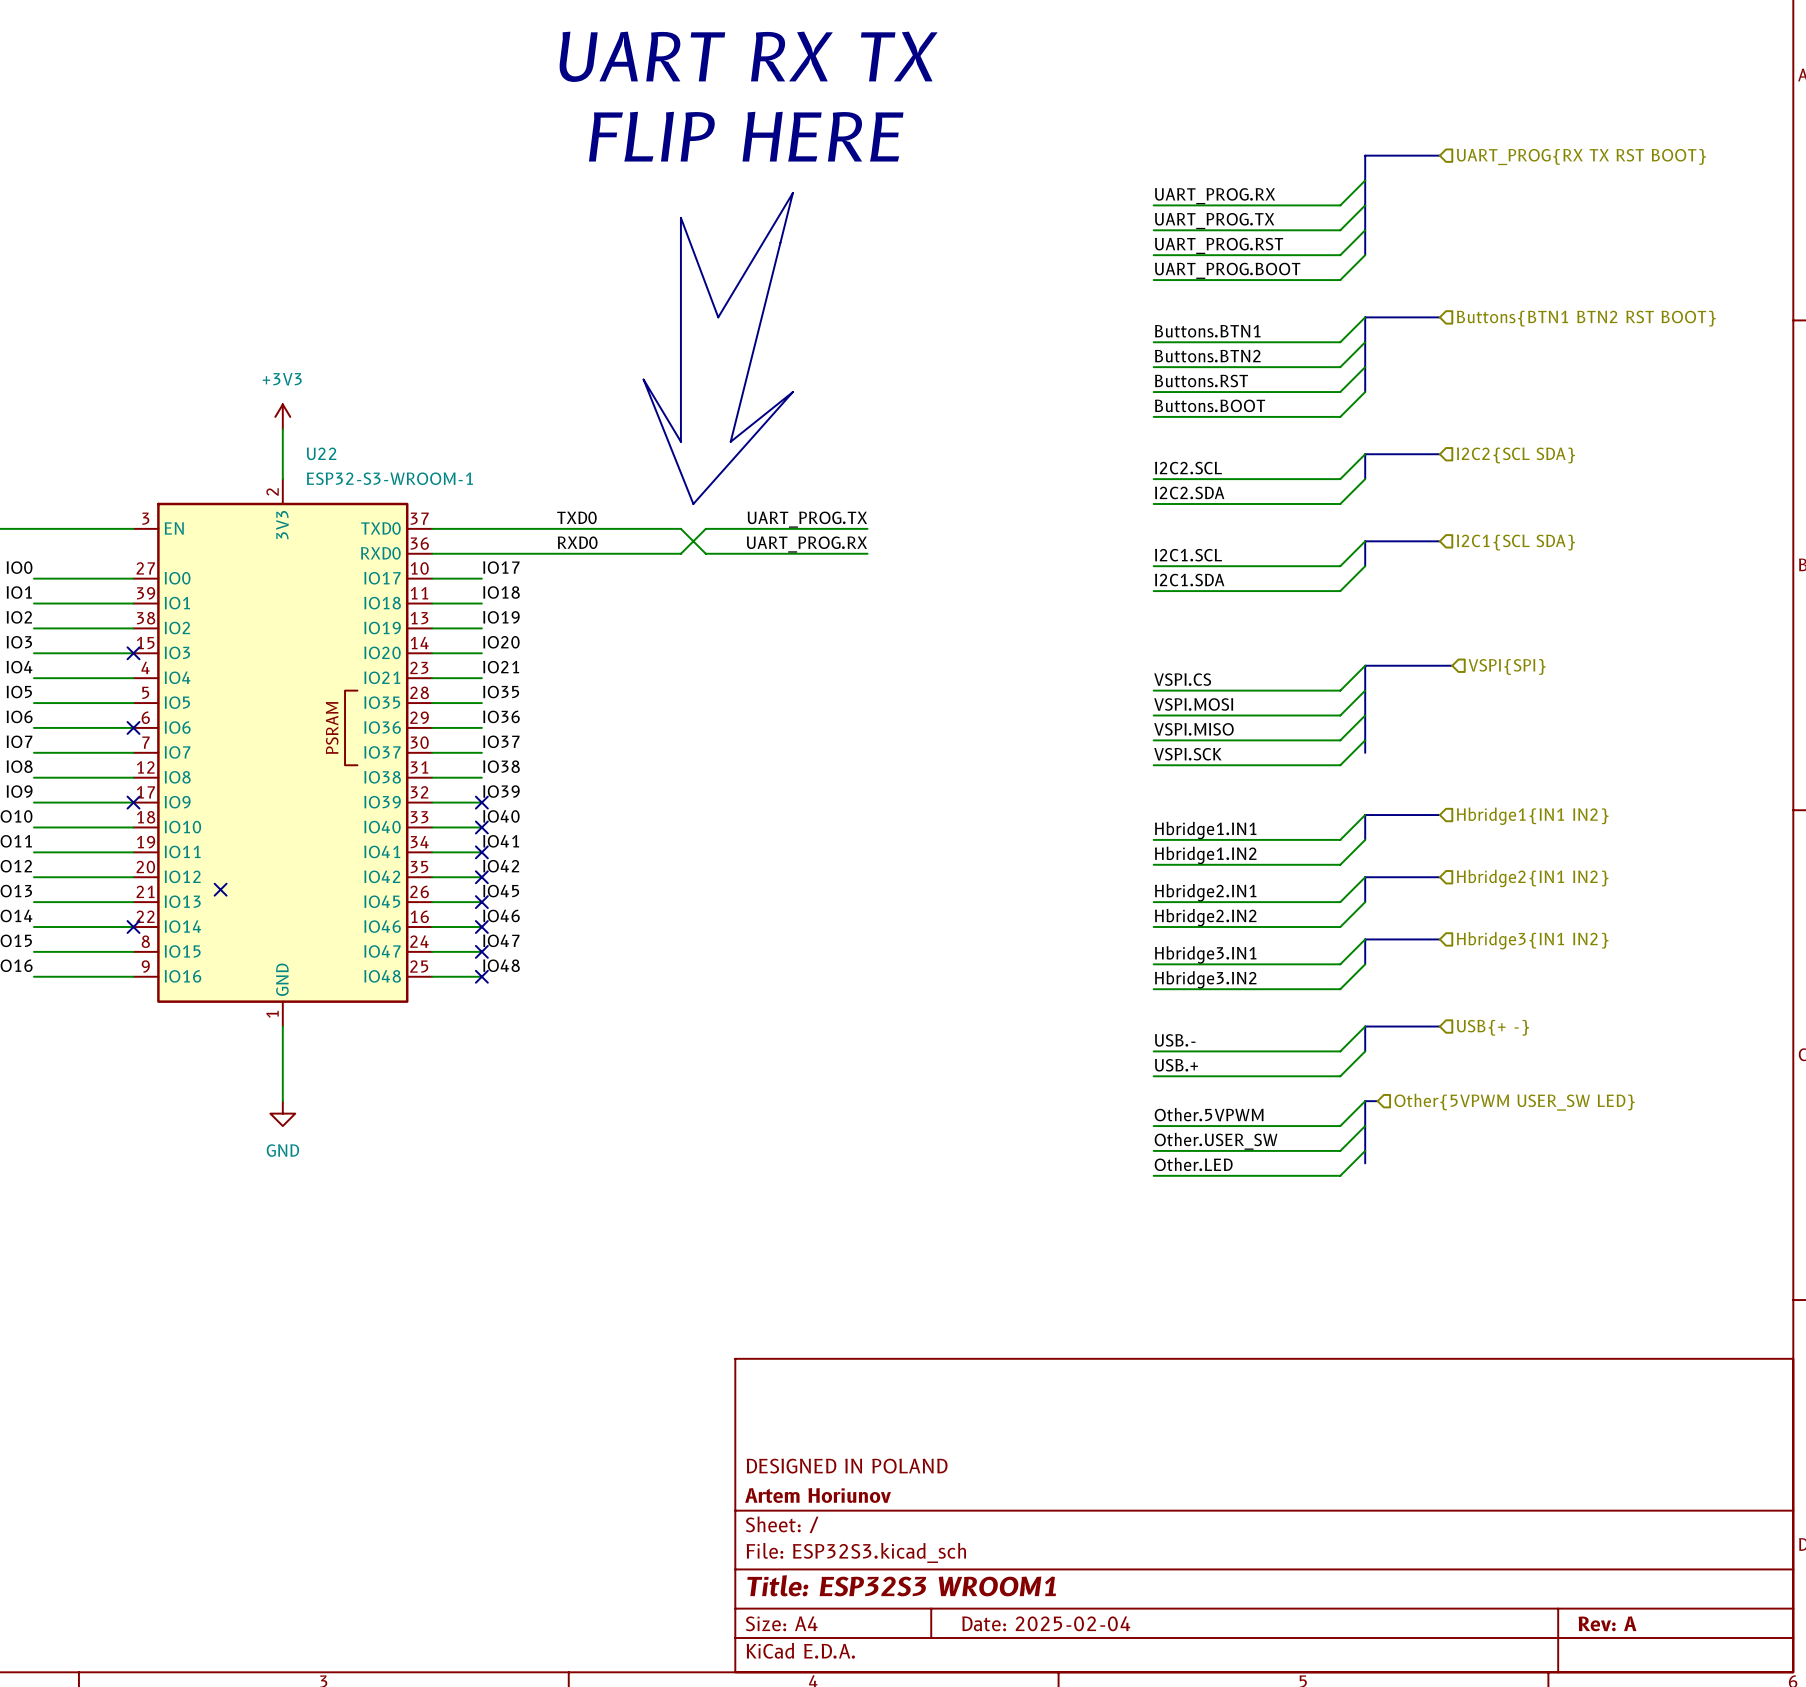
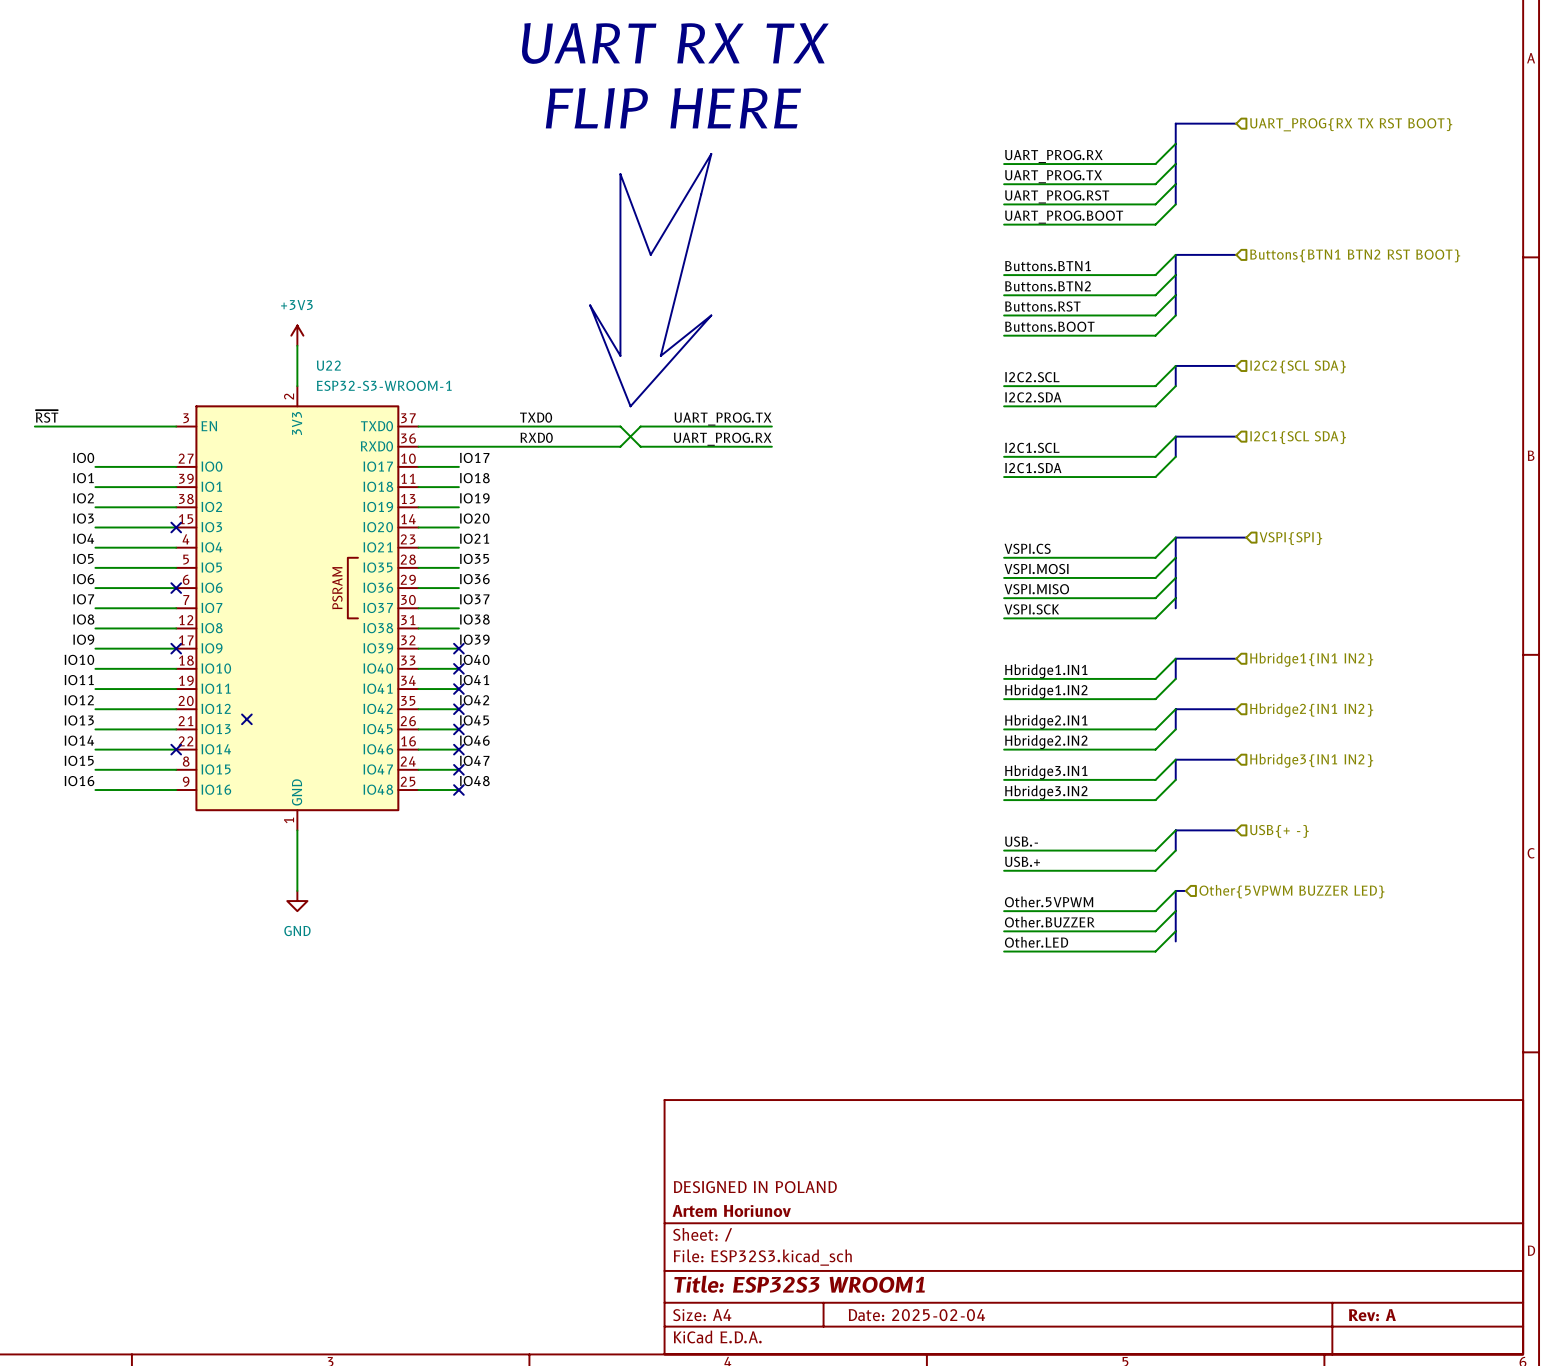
hierarchical label: Other{5VPWM USER_SW LED} (1514, 1102) -> Other{5VPWM BUZZER LED} (1291, 891)
label: Other.USER_SW (1216, 1141) -> Other.BUZZER (1049, 922)

